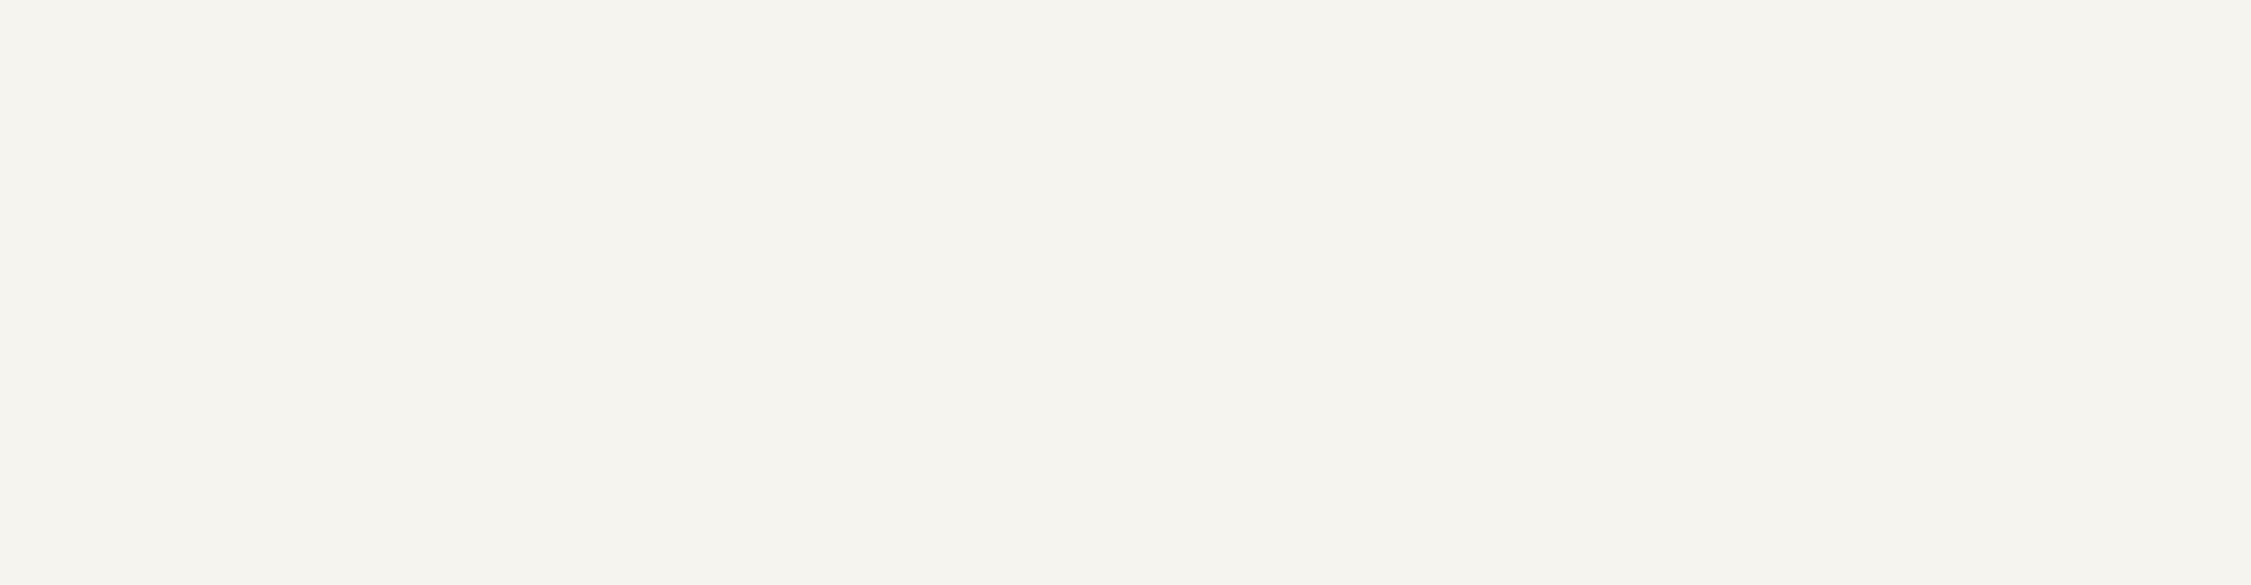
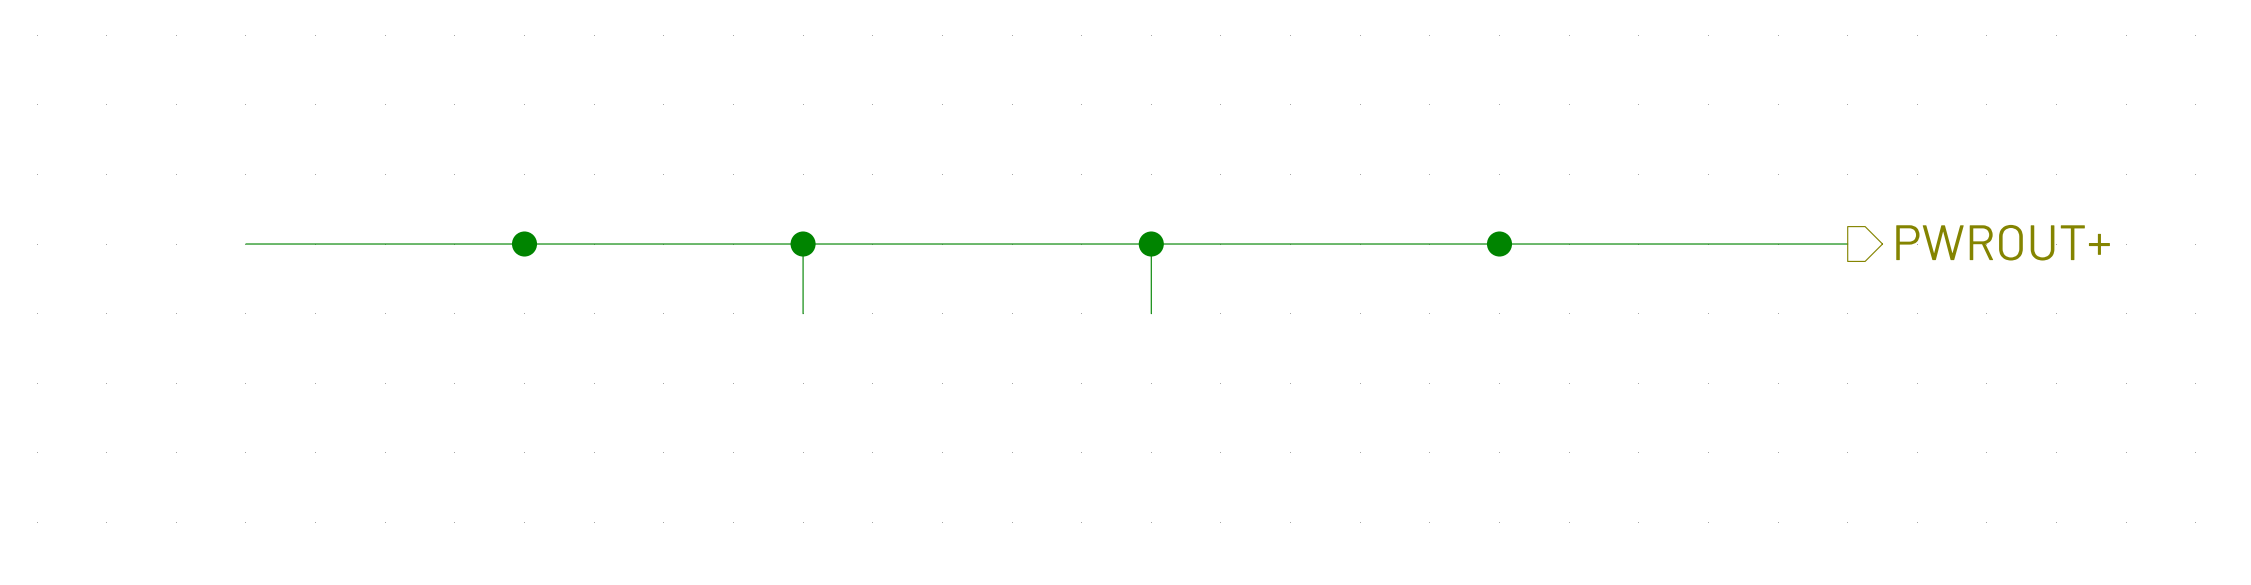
hierarchical label: none -> PWROUT+ (2003, 242)
wire: none -> (245, 244) (1847, 244)
junction: none -> (524, 244)
wire: none -> (803, 244) (803, 313)
junction: none -> (803, 244)
wire: none -> (1151, 244) (1151, 313)
junction: none -> (1151, 244)
junction: none -> (1499, 244)

